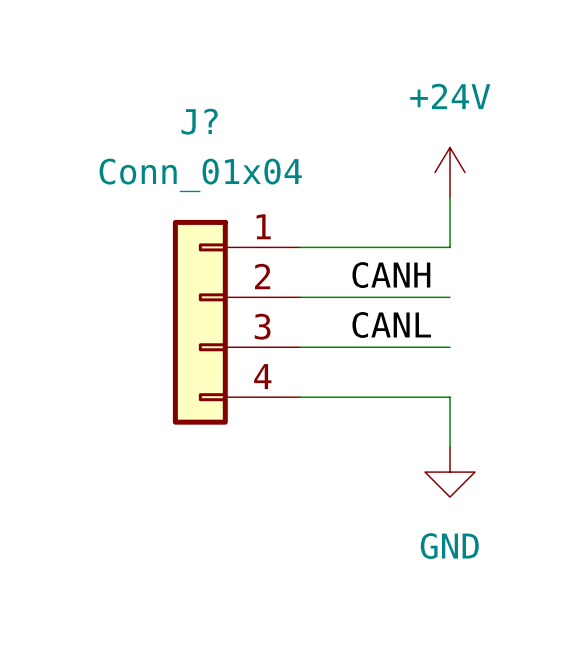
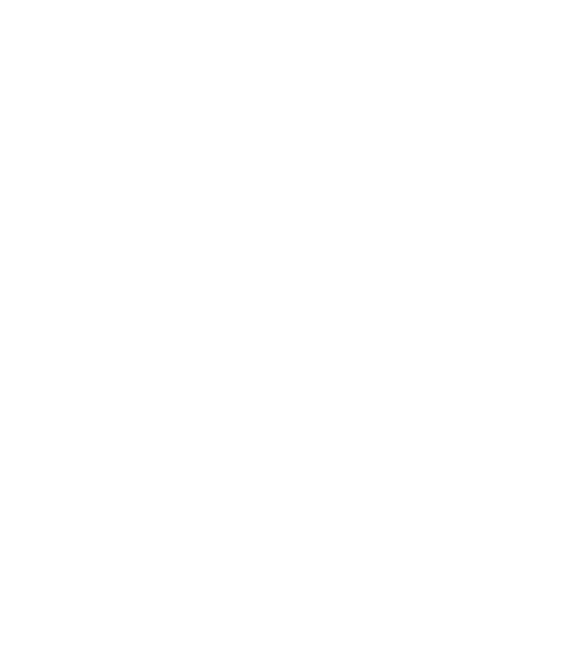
power symbol: +24V (449, 172) -> none
wire: (449, 197) (449, 247) (300, 247) -> none
label: CANH (391, 275) -> none
wire: (300, 297) (449, 297) -> none
J?: Conn_01x04 (236, 322) -> none
label: CANL (391, 325) -> none
wire: (300, 347) (449, 347) -> none
wire: (300, 397) (449, 397) (449, 447) -> none
power symbol: GND (449, 472) -> none

